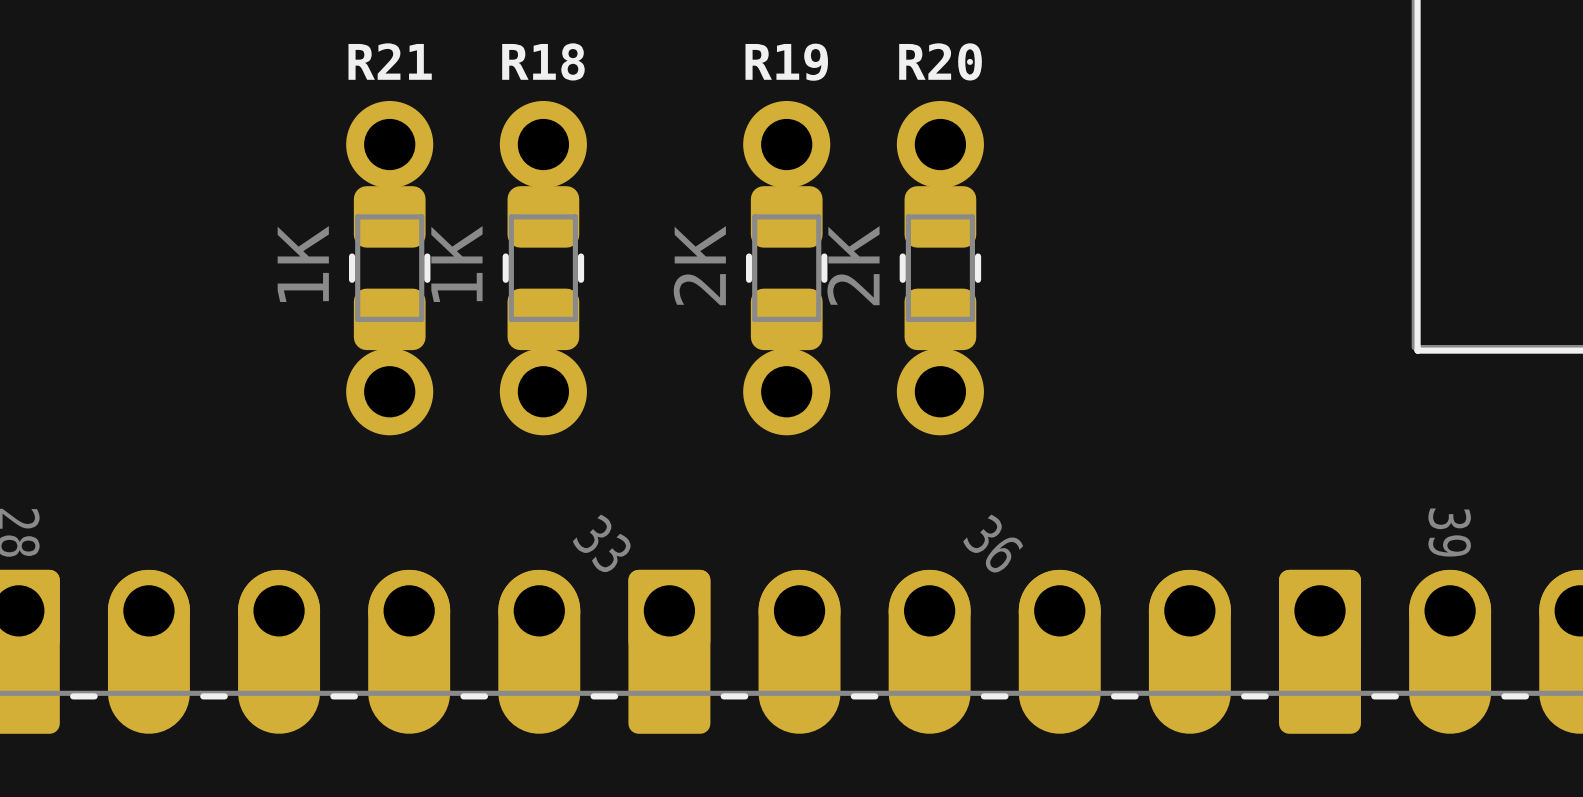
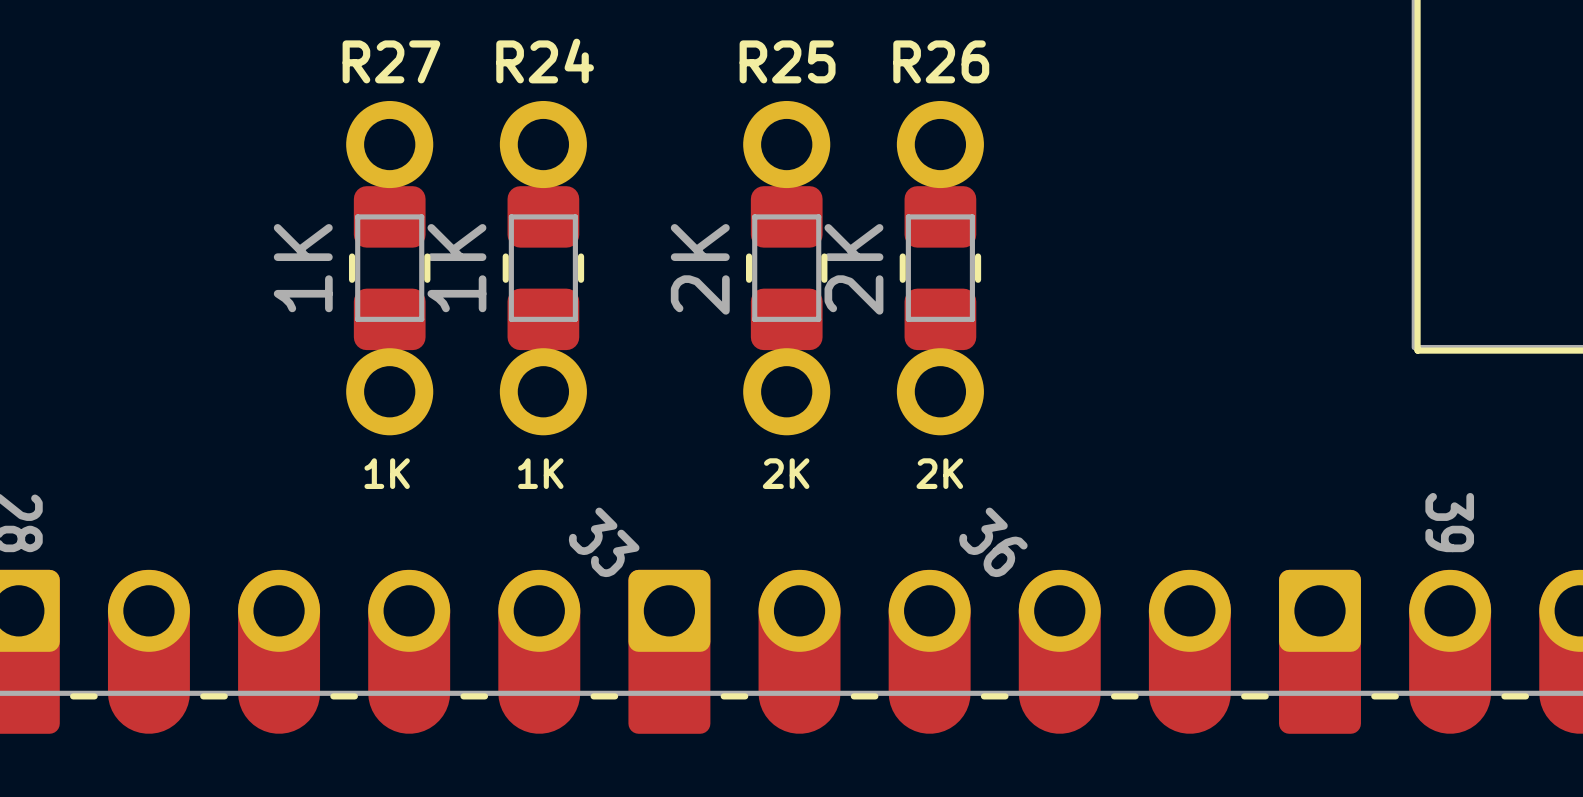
R21 name: R21 (390, 61) -> R27 (391, 61)
R18 name: R18 (543, 61) -> R24 (545, 61)
R20 name: R20 (940, 61) -> R26 (941, 61)
R19 name: R19 (786, 62) -> R25 (787, 61)
text: none -> 1K (387, 473)
text: none -> 1K (540, 473)
text: none -> 2K (786, 473)
text: none -> 2K (939, 473)

